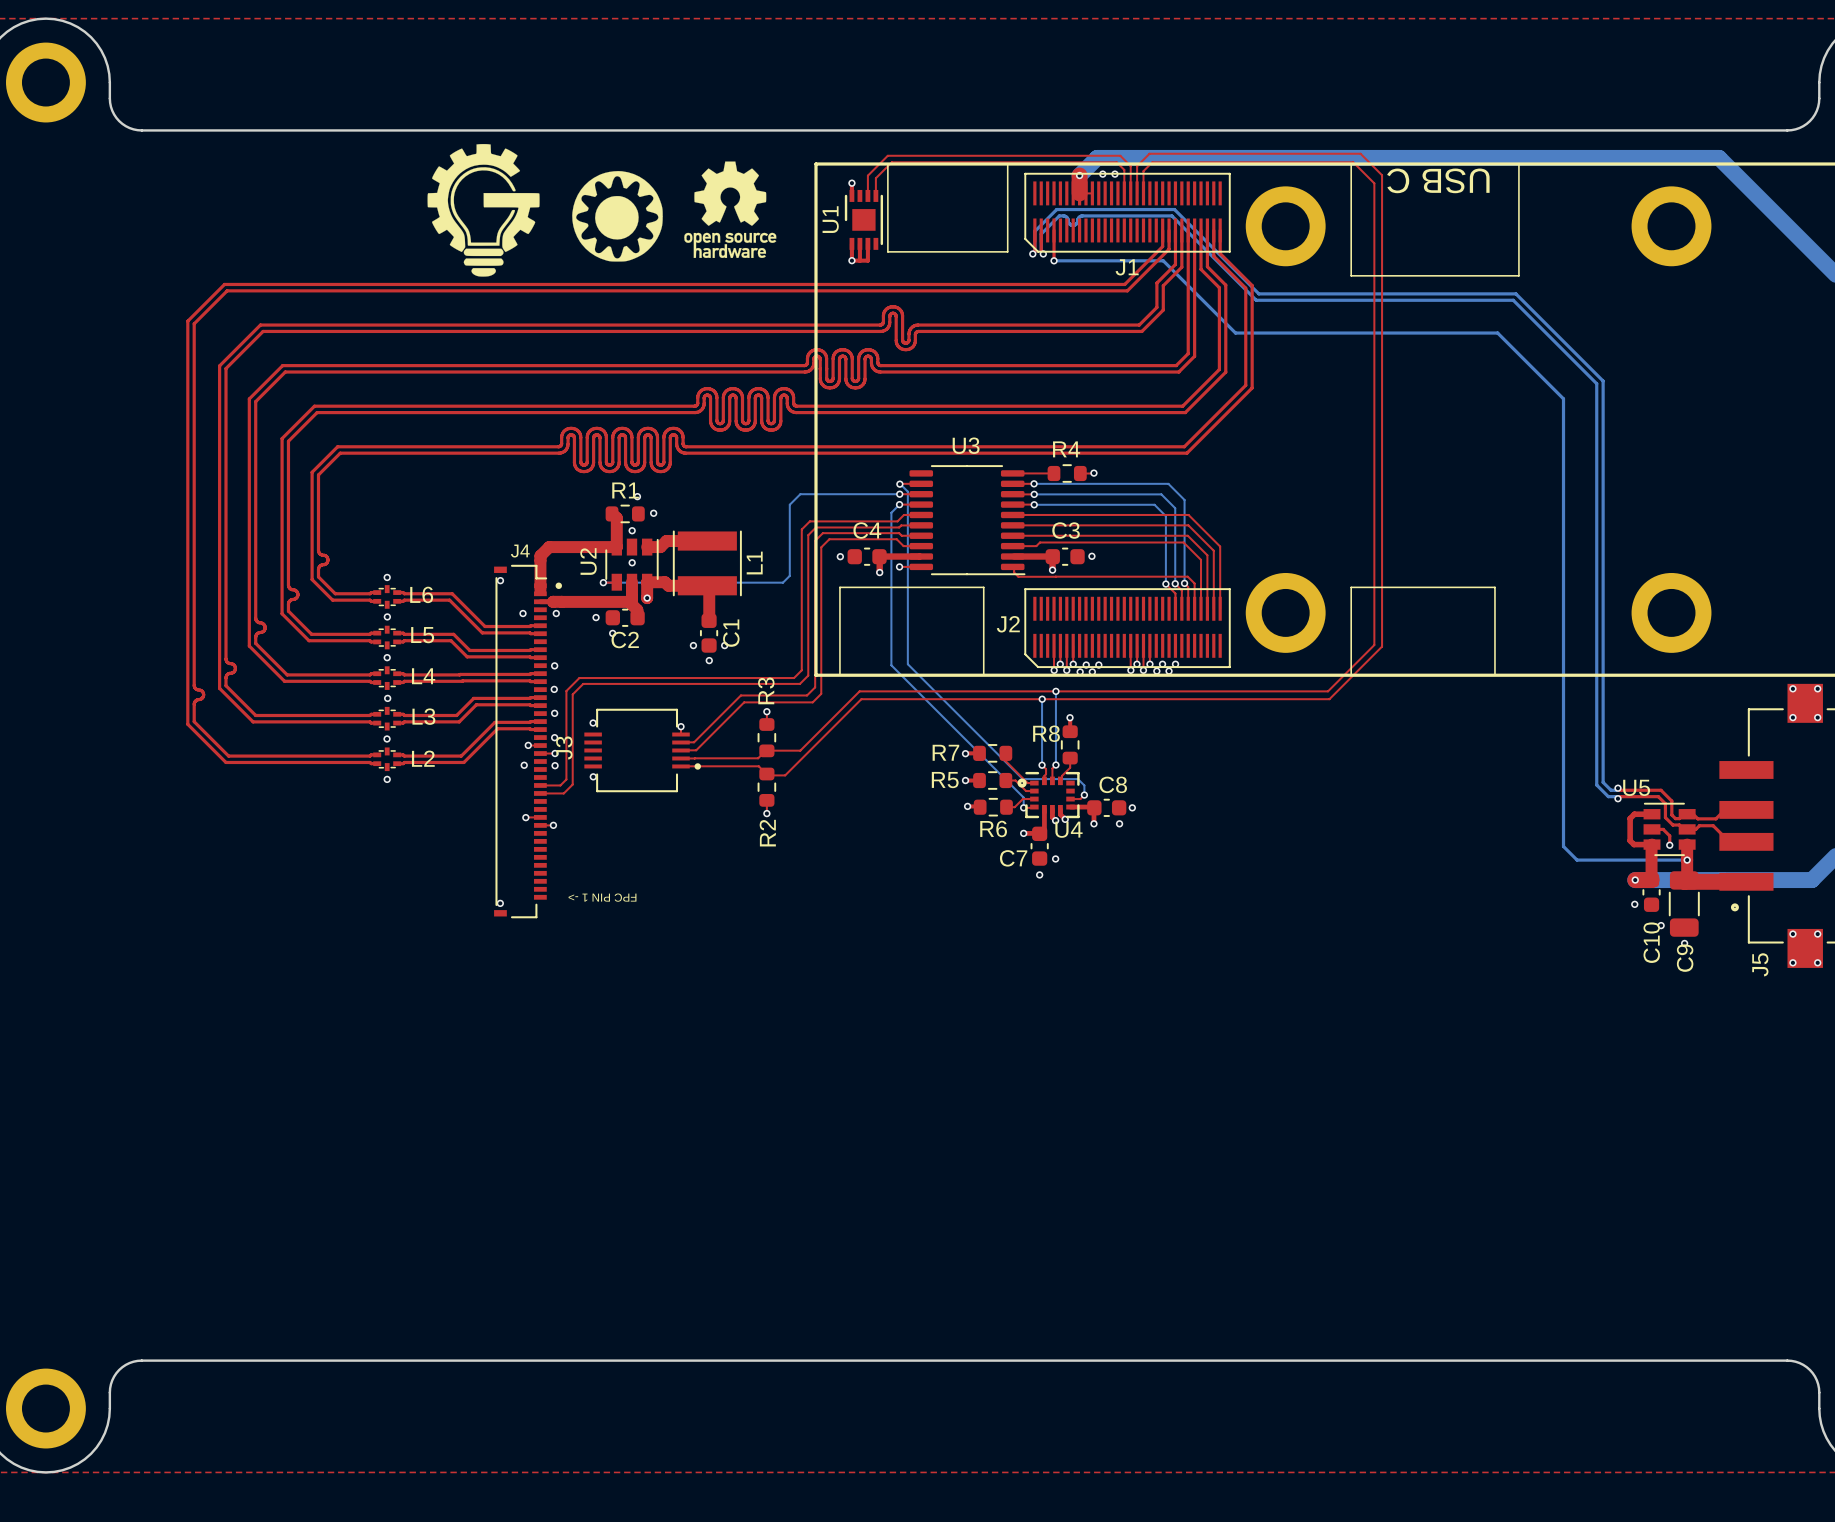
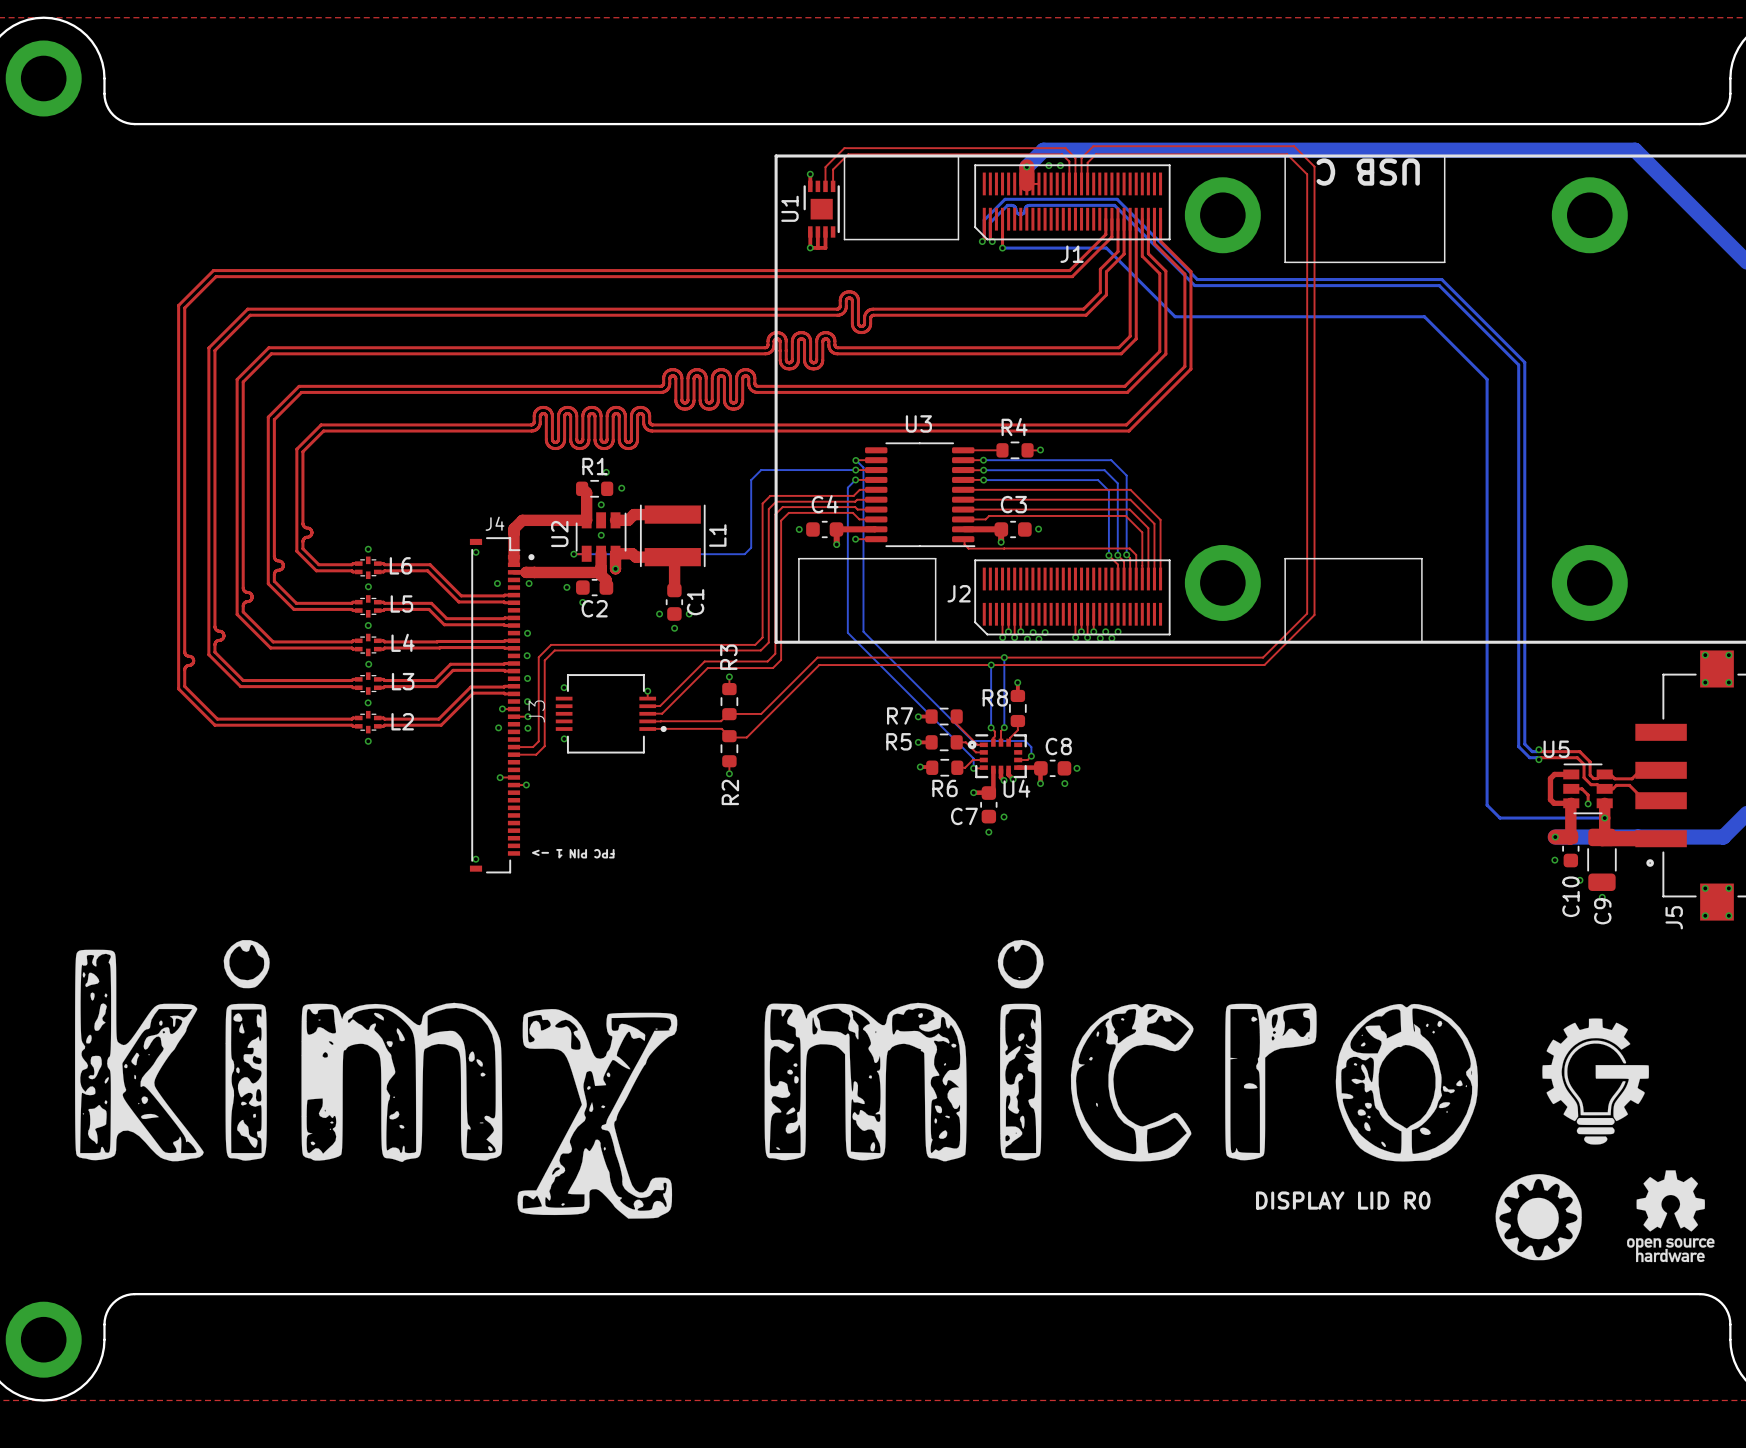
drawing: [427, 144, 540, 277] -> none
drawing: [684, 161, 777, 259] -> none
drawing: [572, 171, 663, 262] -> none
drawing: none -> [75, 939, 1582, 1261]
drawing: none -> [1542, 1018, 1649, 1145]
drawing: none -> [1627, 1170, 1715, 1263]
text: none -> DISPLAY LID R0 (1343, 1200)

